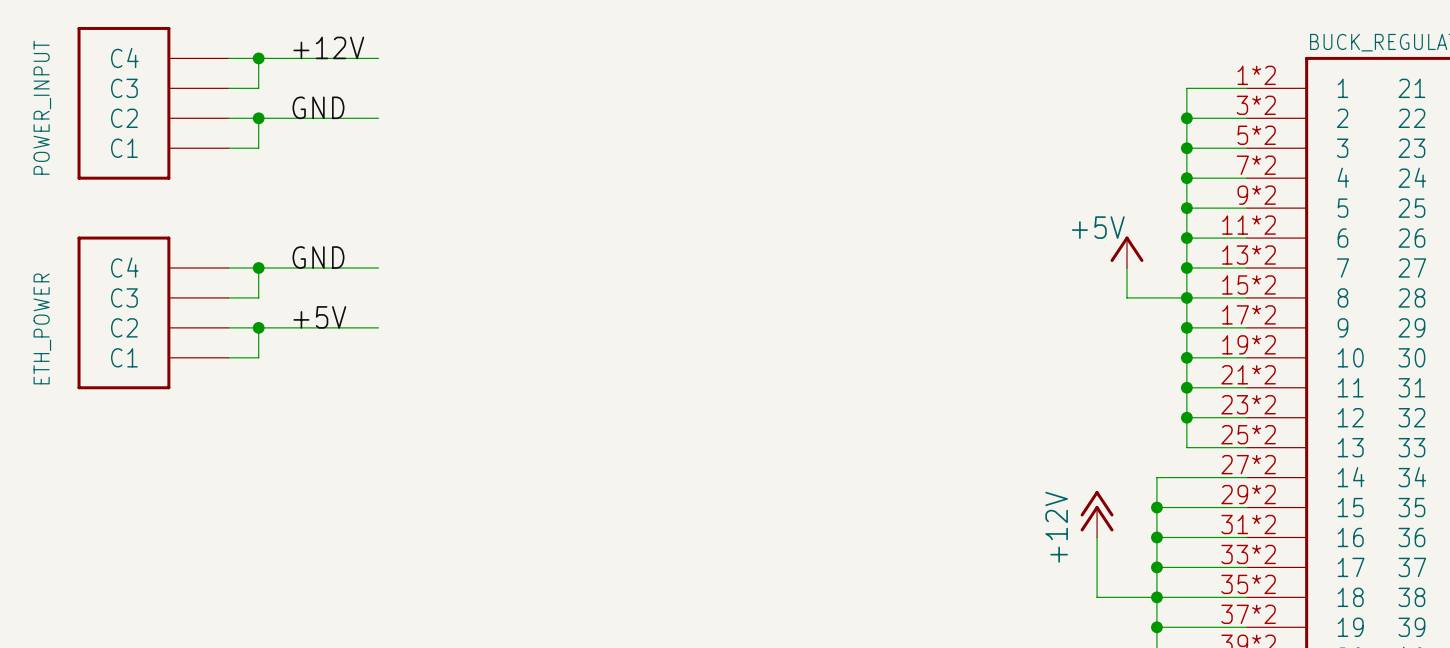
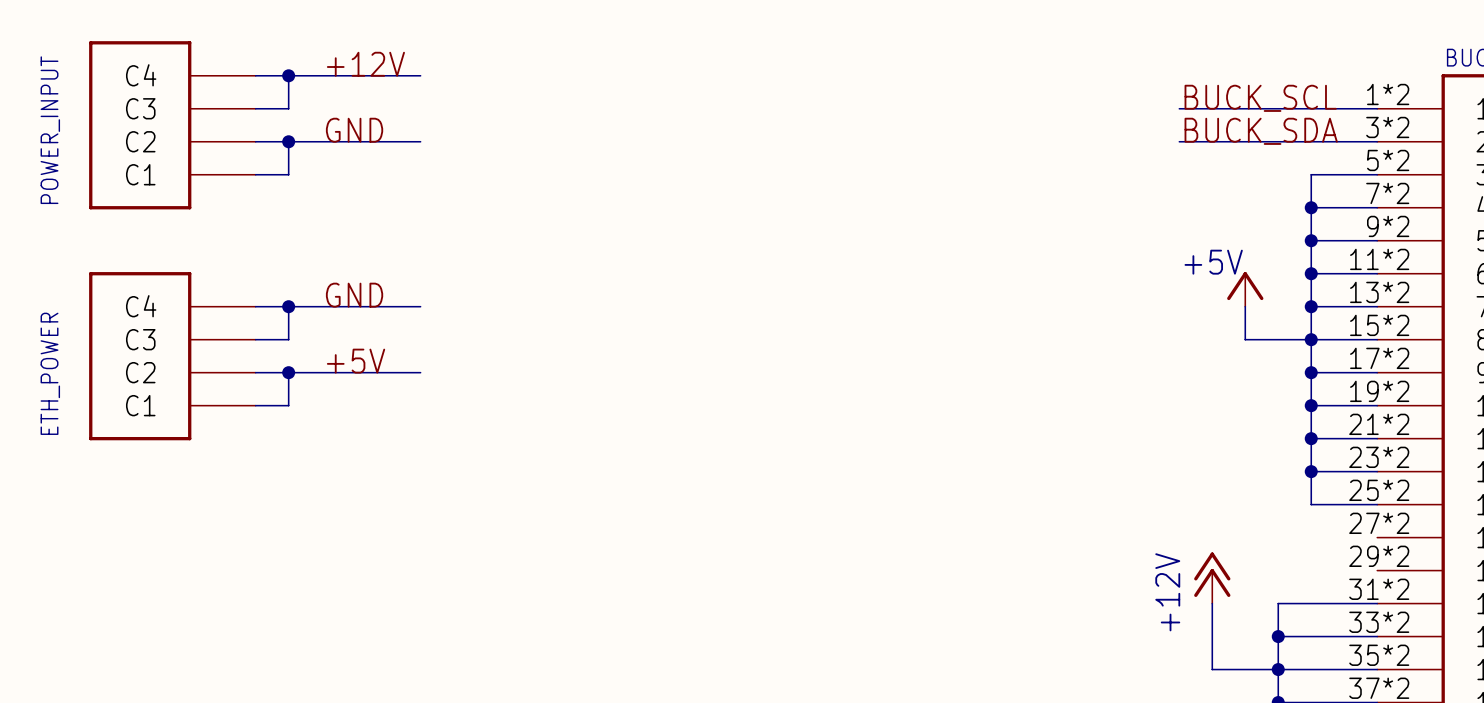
label: none -> BUCK_SCL (1260, 98)
wire: (1186, 88) (1186, 148) -> (1311, 108) (1179, 108)
label: none -> BUCK_SDA (1261, 131)
wire: none -> (1179, 141) (1311, 141)
junction: (1186, 118) -> none
junction: (1186, 148) -> none
wire: (1246, 477) (1156, 477) (1156, 537) -> none
wire: (1156, 507) (1246, 507) -> none
junction: (1156, 507) -> none
junction: (1156, 537) -> none

